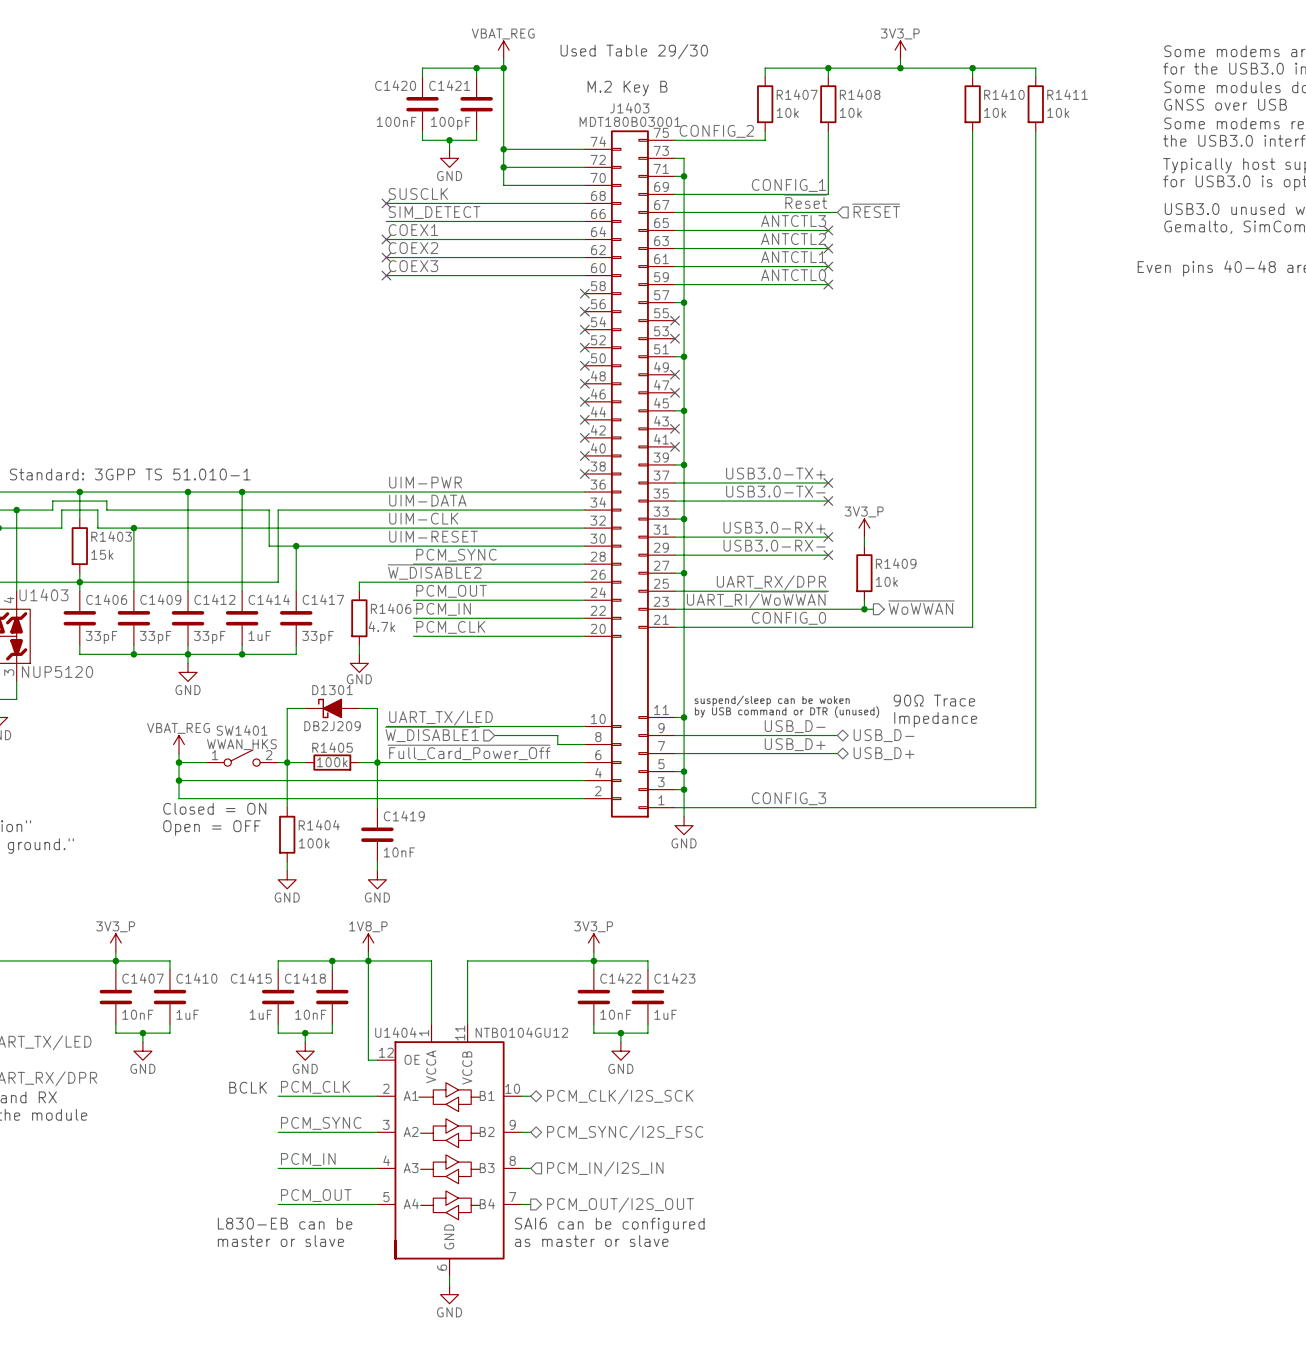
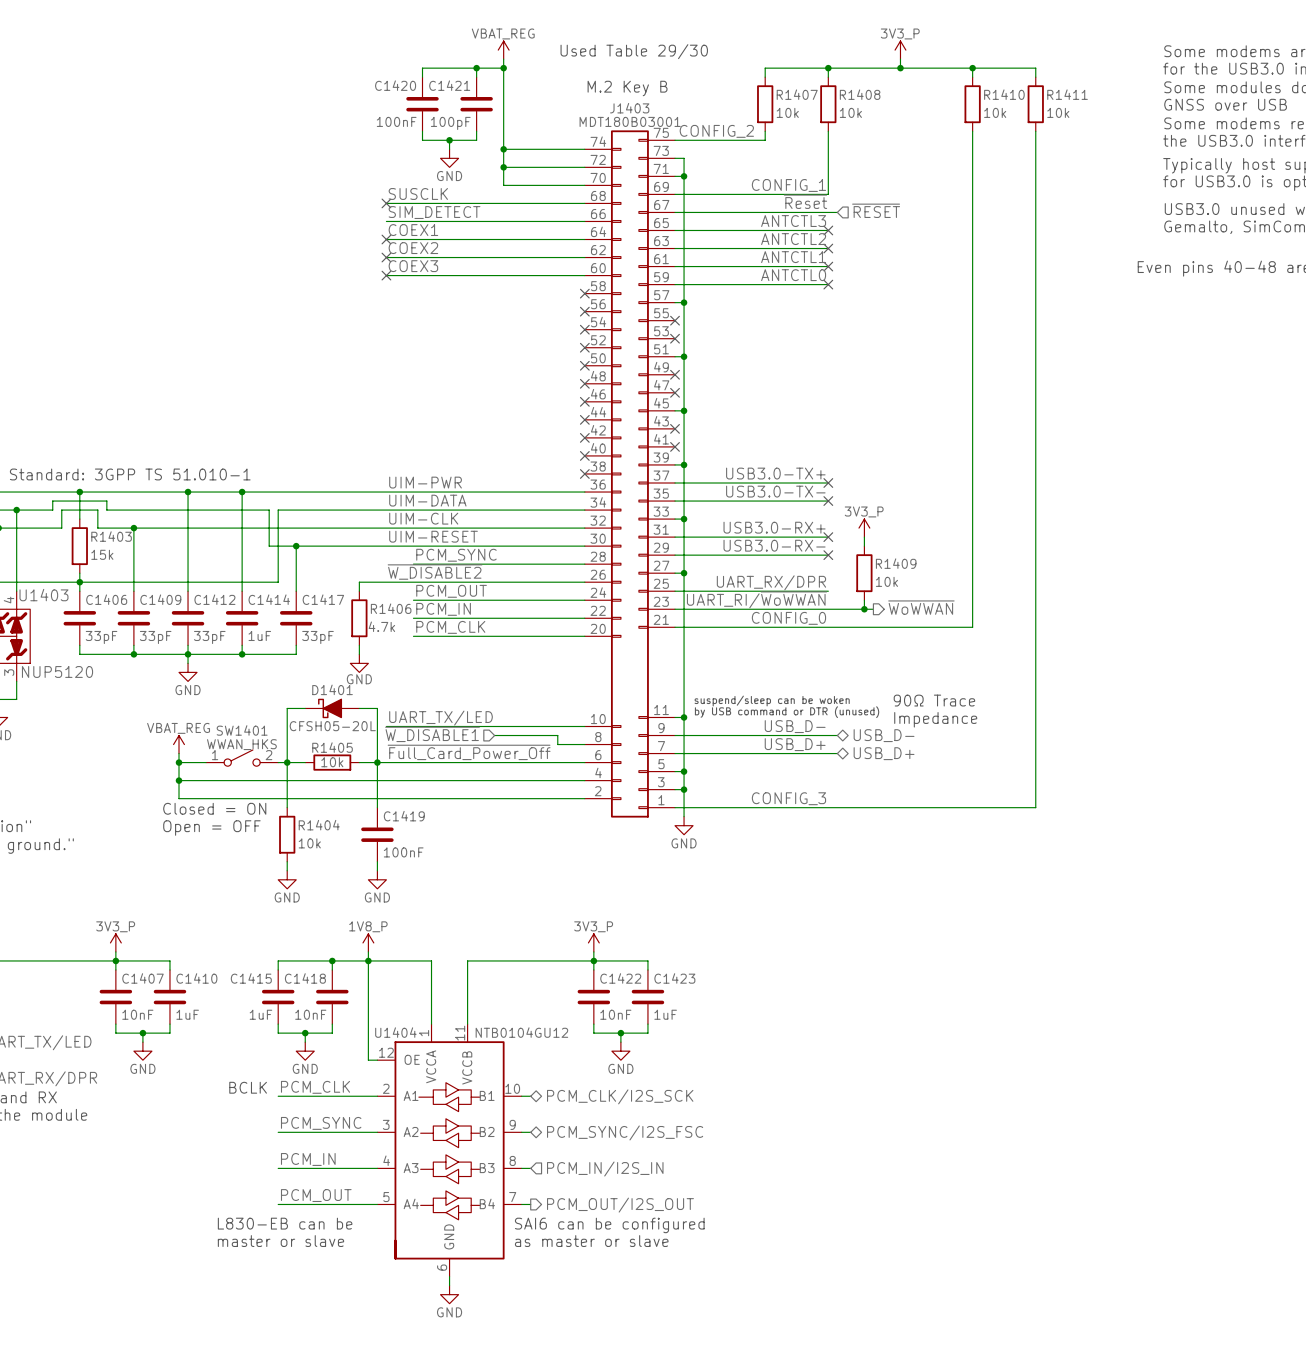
D1301 name: D1301 (332, 690) -> D1401 (332, 689)
D1301 value: DB2J209 (332, 726) -> CFSH05-20L (332, 726)
R1405 value: 100k (332, 762) -> 10k (332, 762)
R1404 value: 100k (314, 843) -> 10k (309, 843)
C1419 value: 10nF (399, 852) -> 100nF (403, 852)

